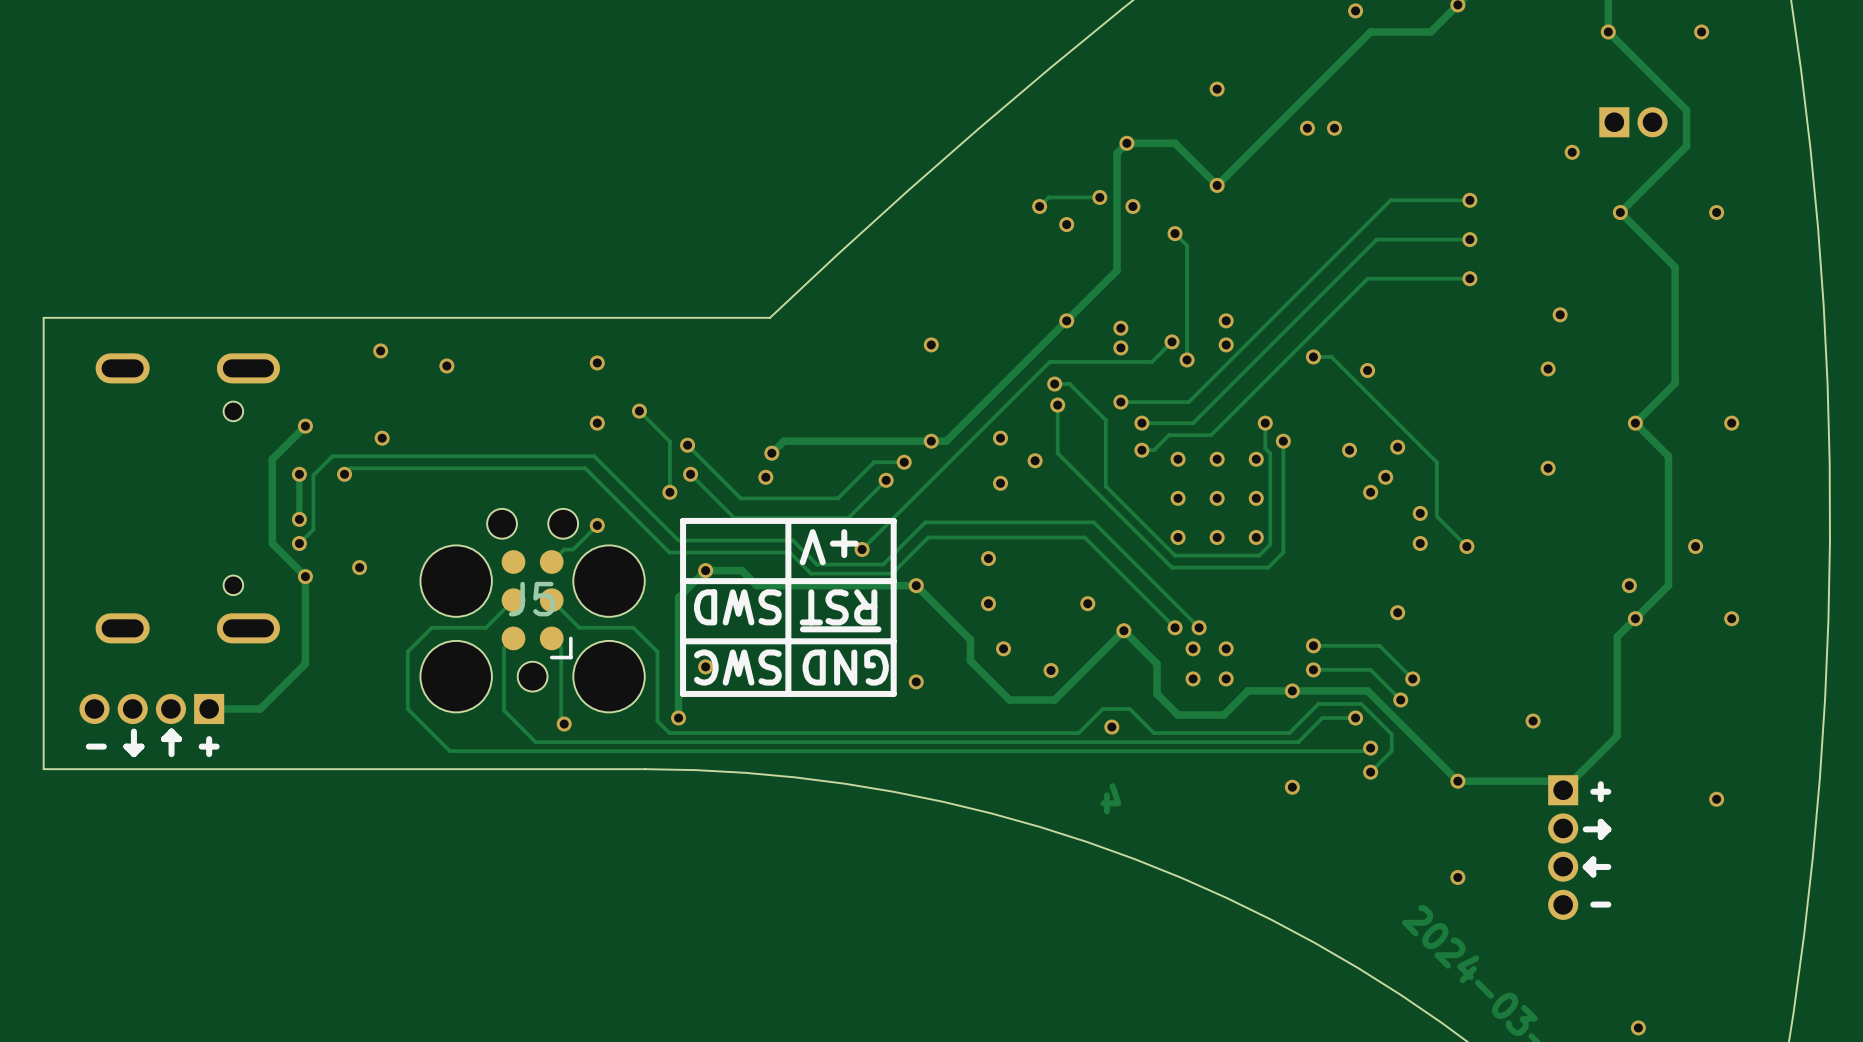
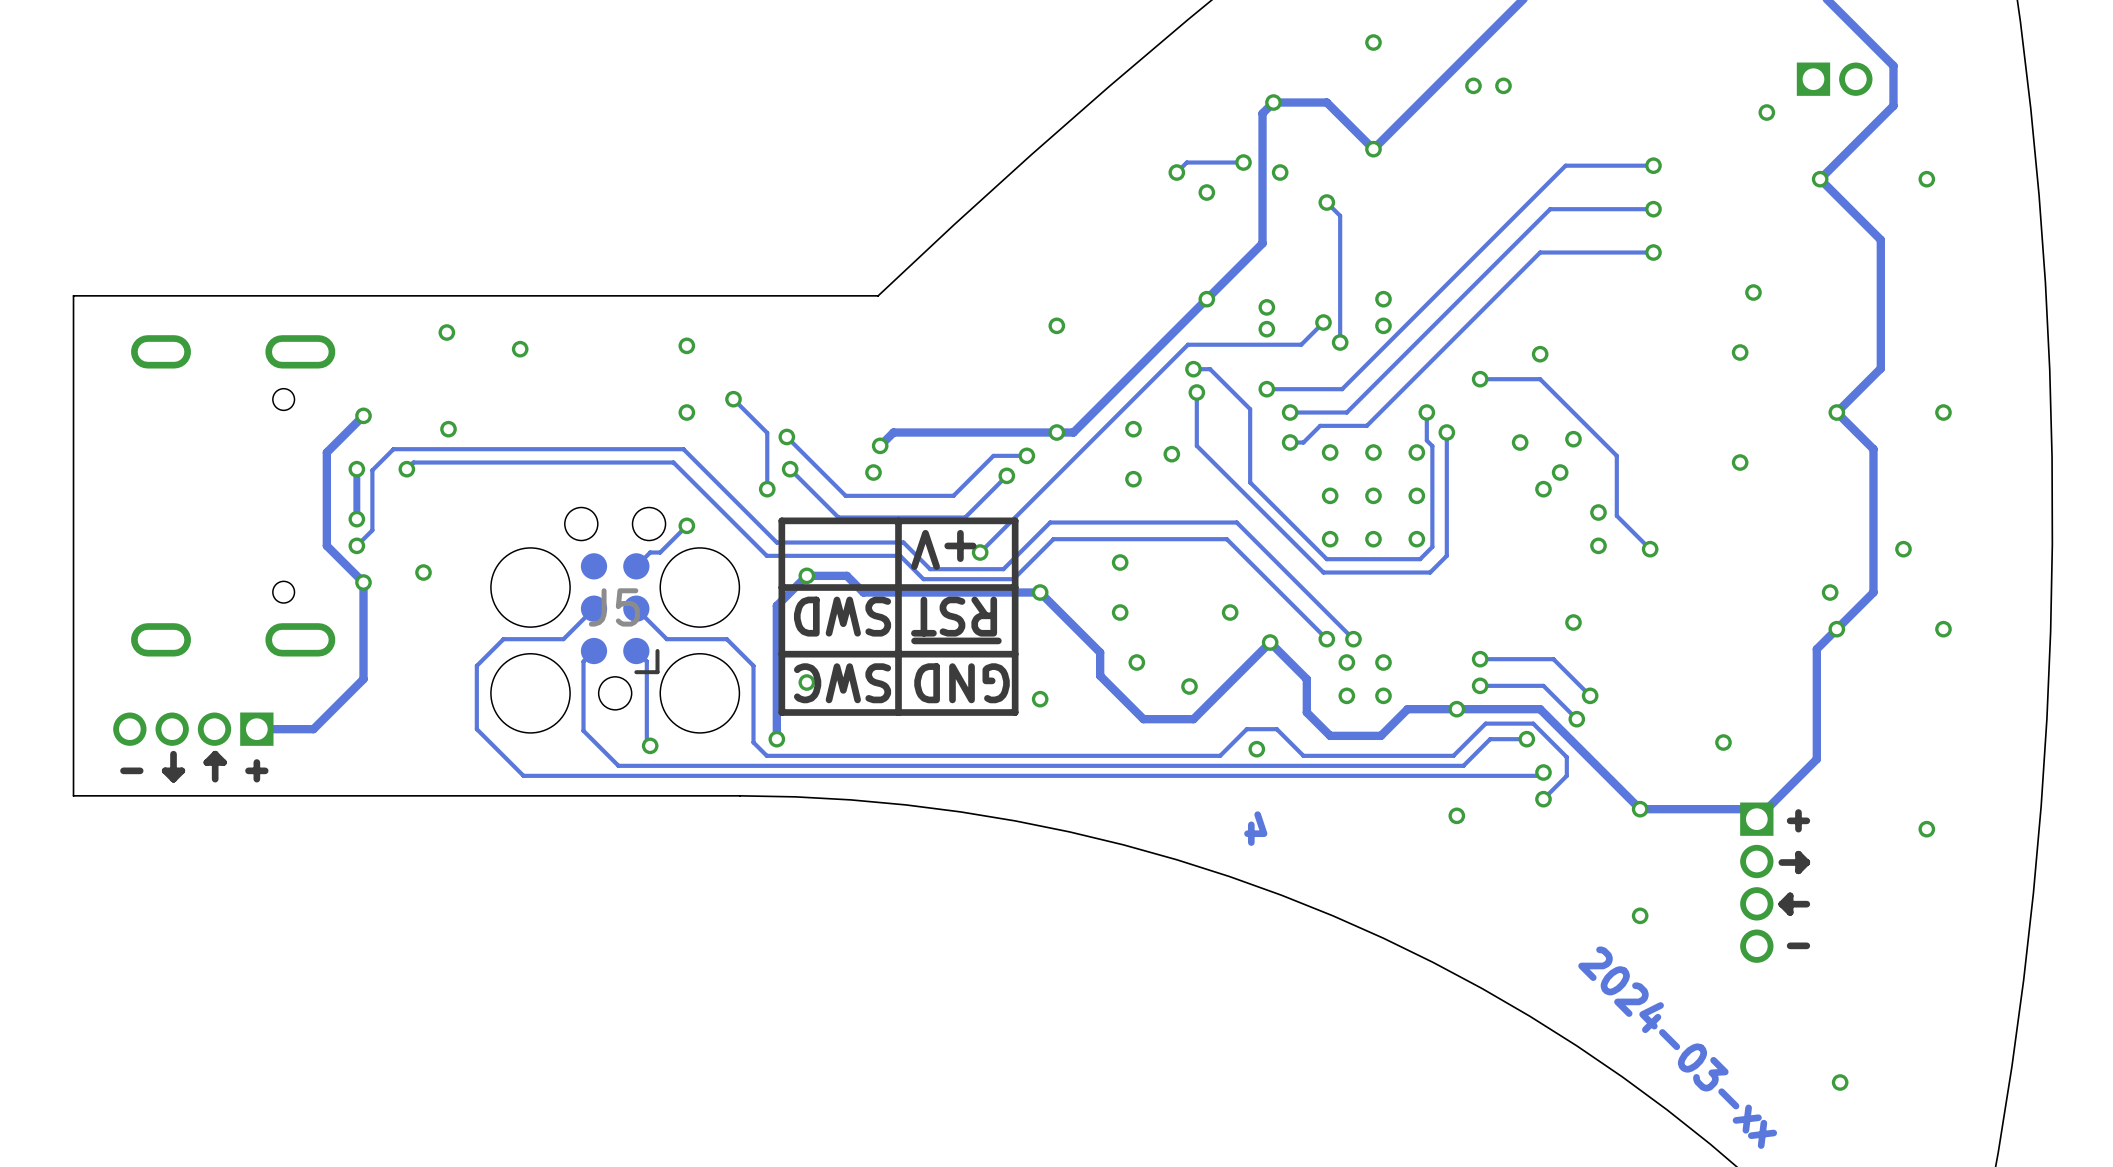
track: (1313, 356) (1331, 356) (1367, 393) -> (1480, 379) (1540, 379)
via position: (1313, 356) -> (1480, 379)

